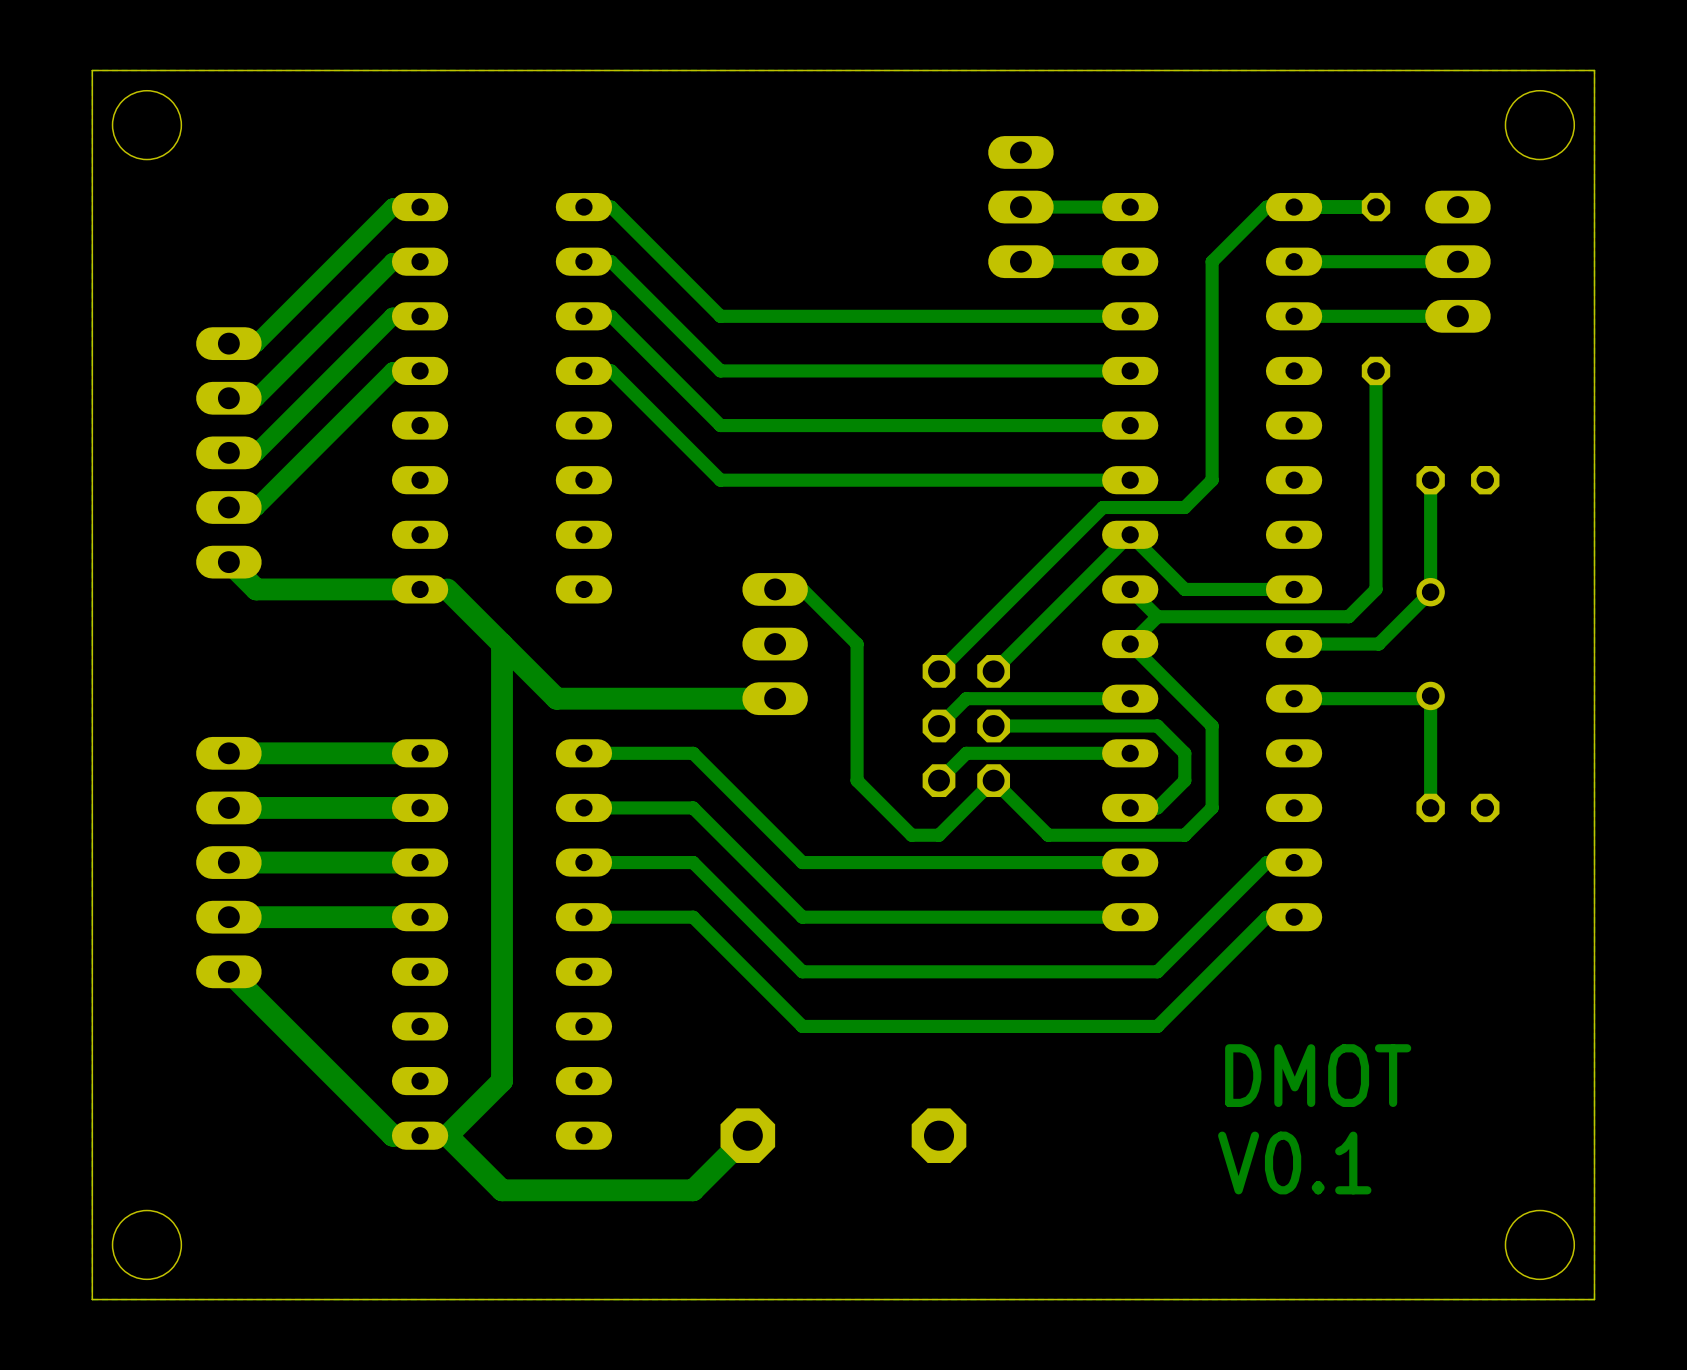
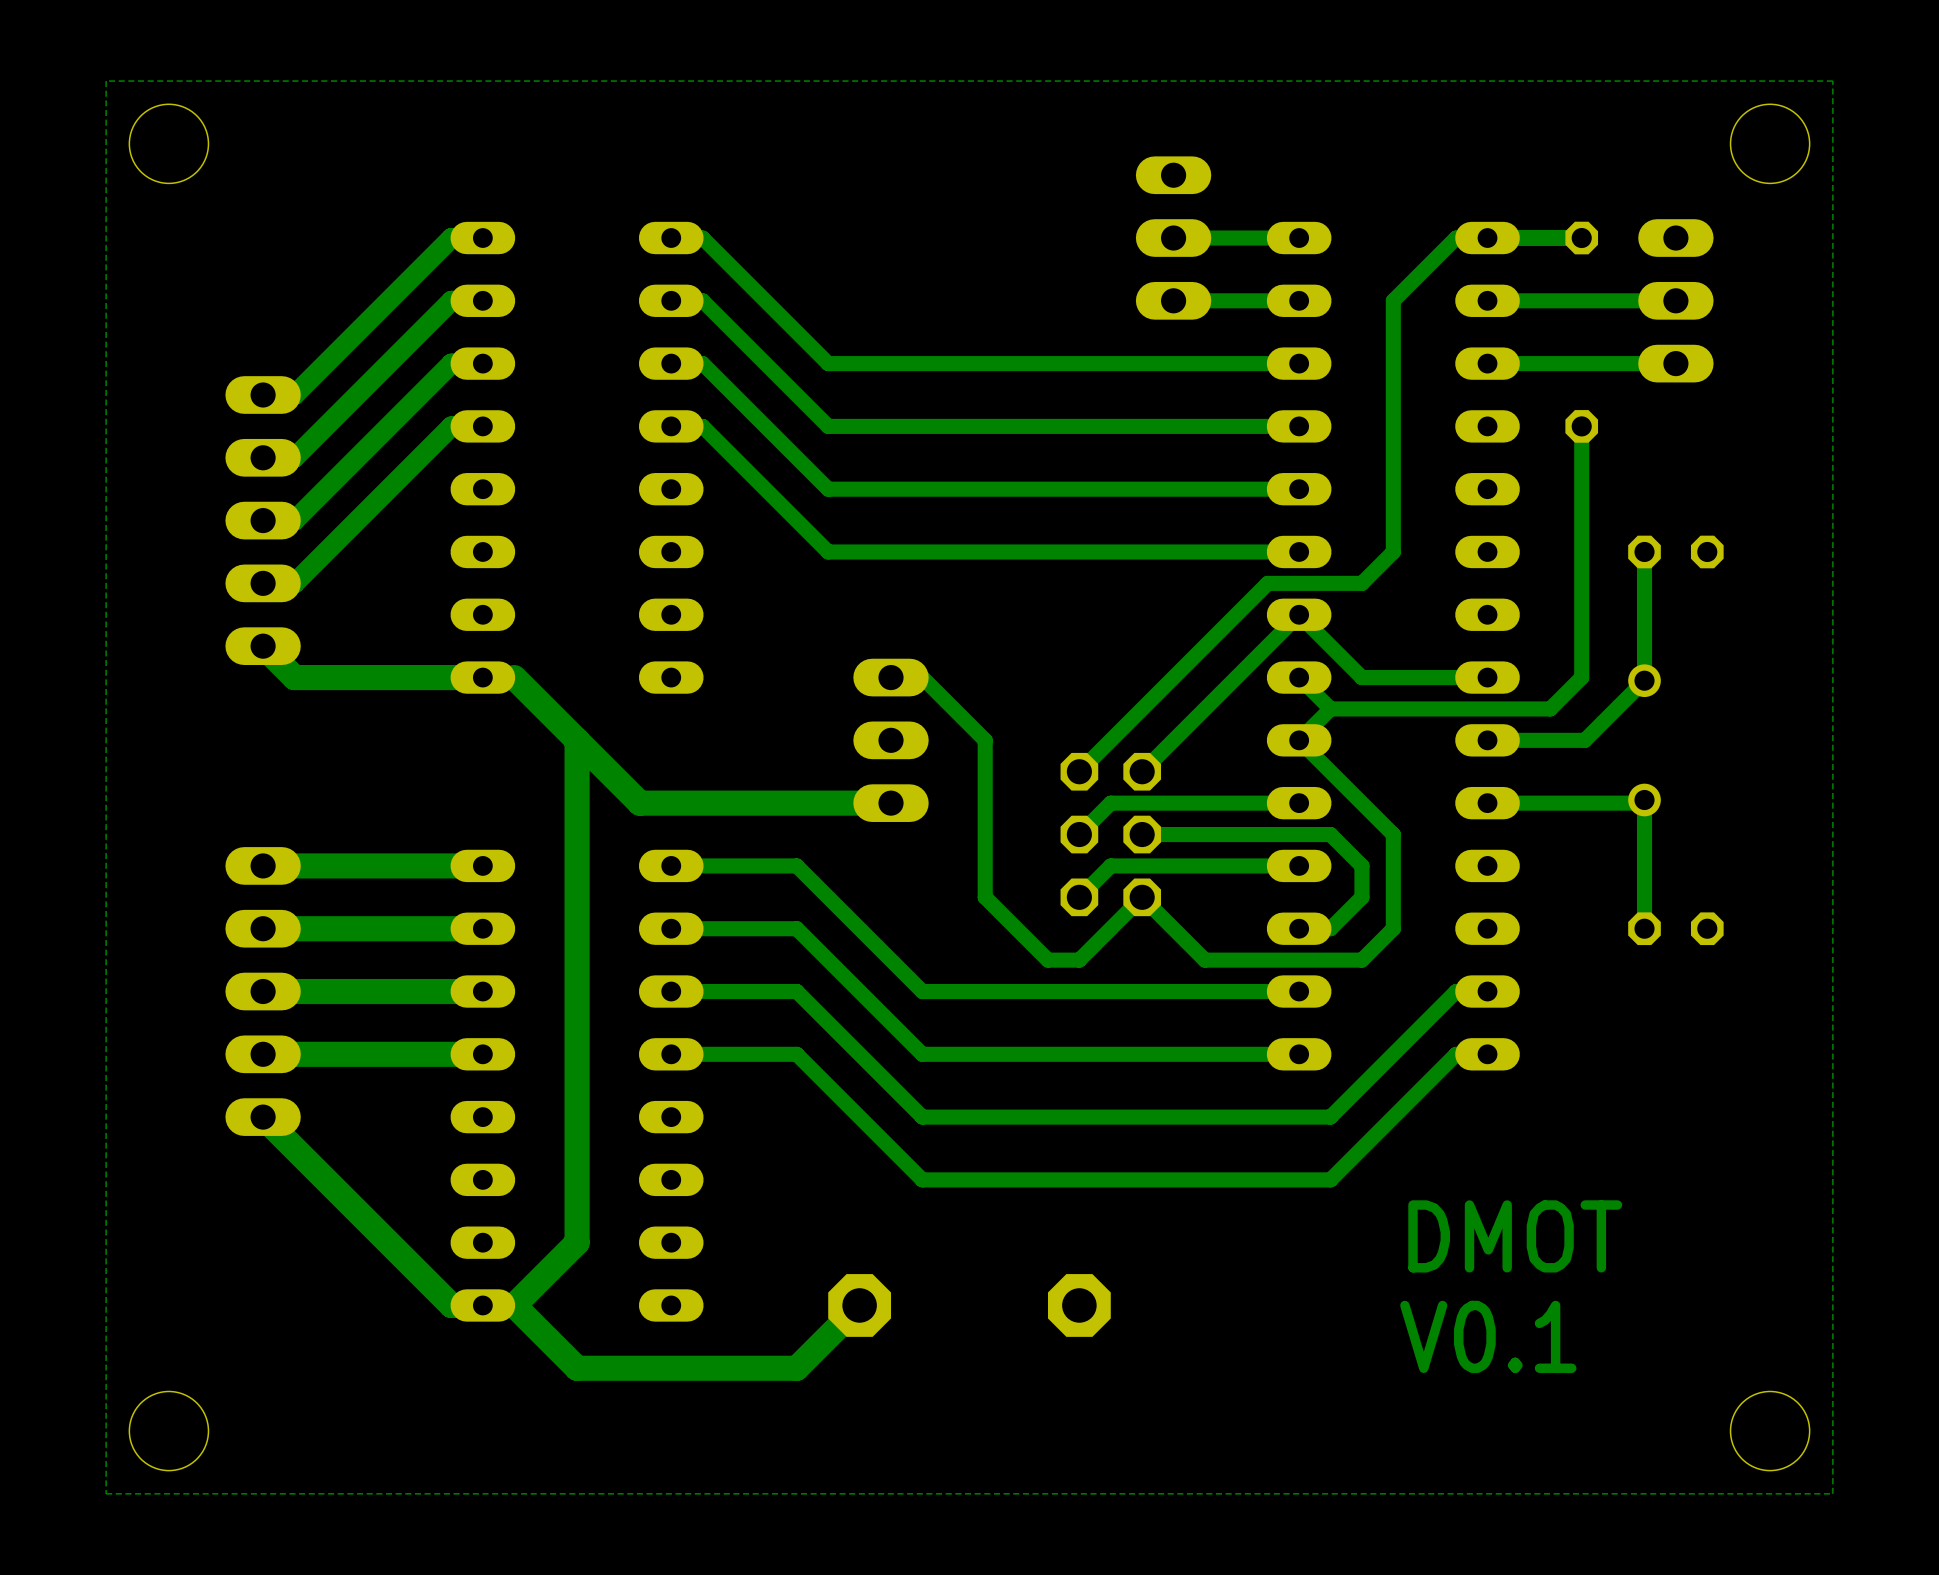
board edge: (1594, 70) (92, 70) (92, 1299) (1594, 1299) (1594, 70) -> none

